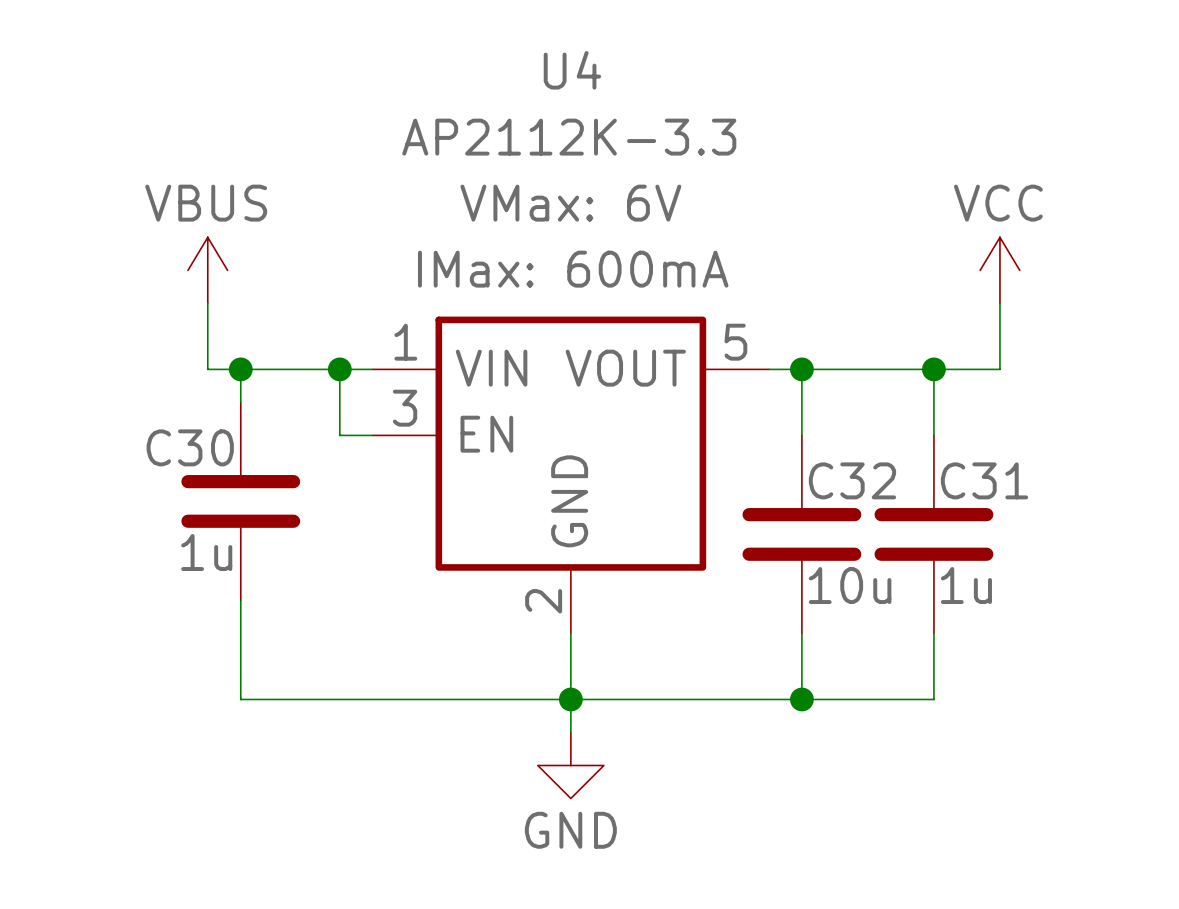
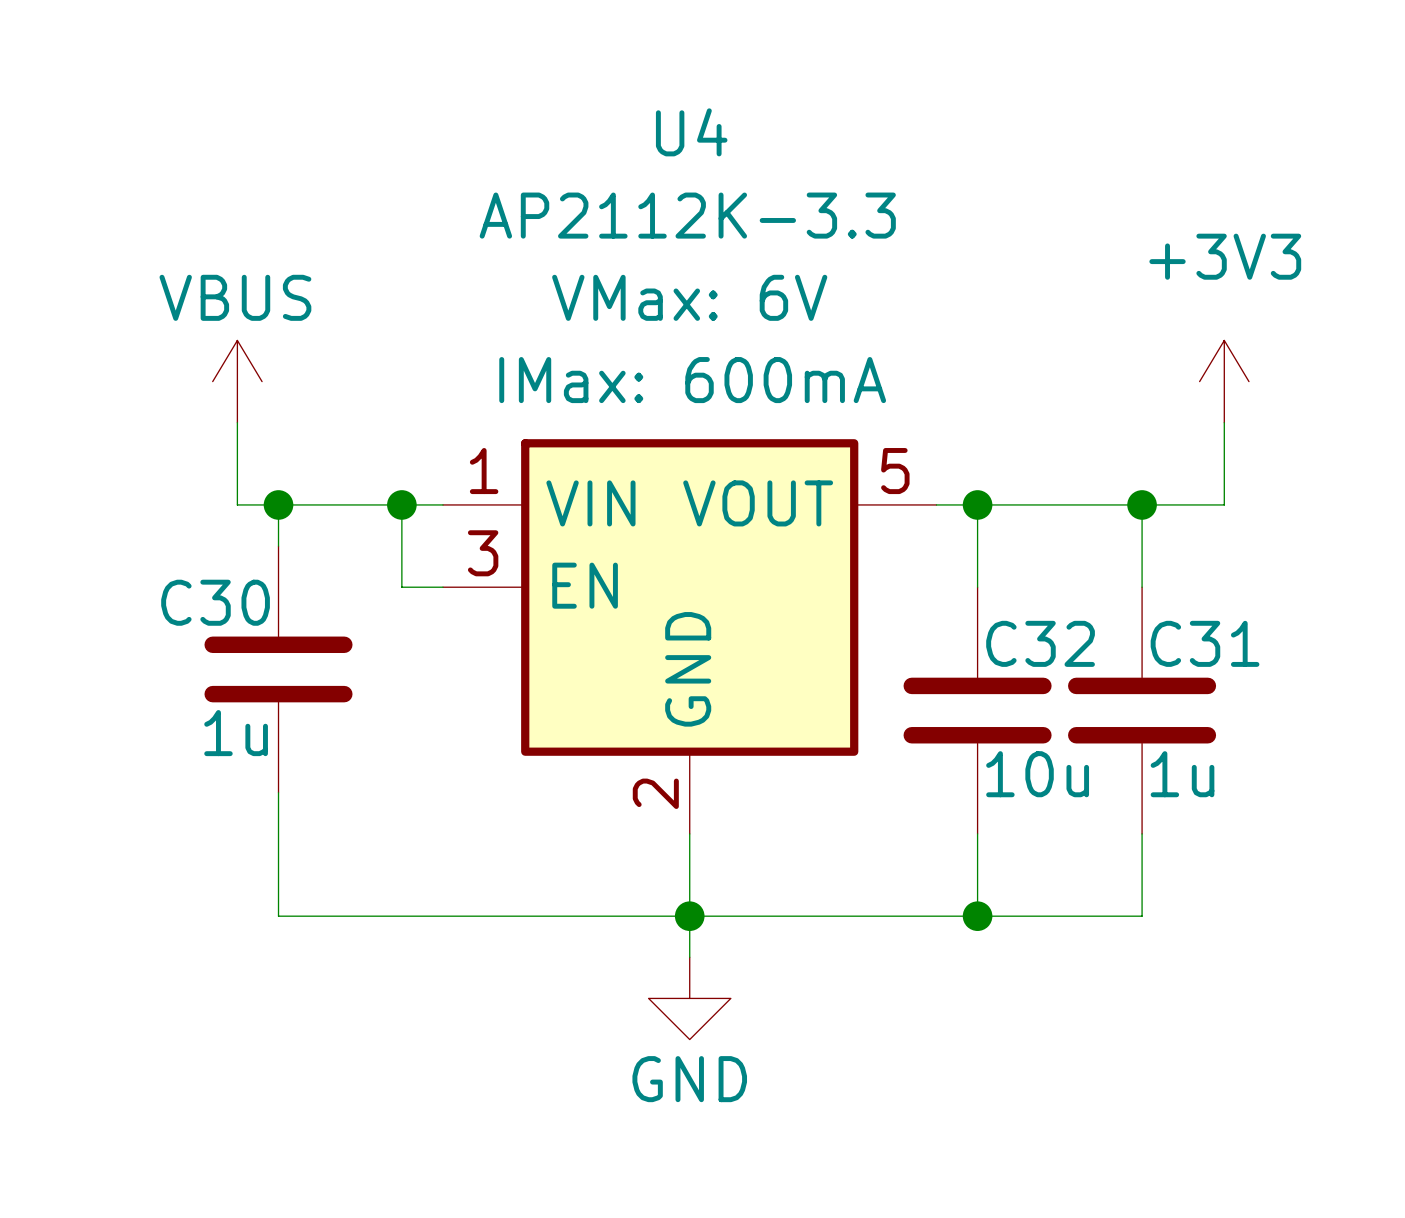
power symbol: VCC (999, 270) -> +3V3 (1224, 381)

